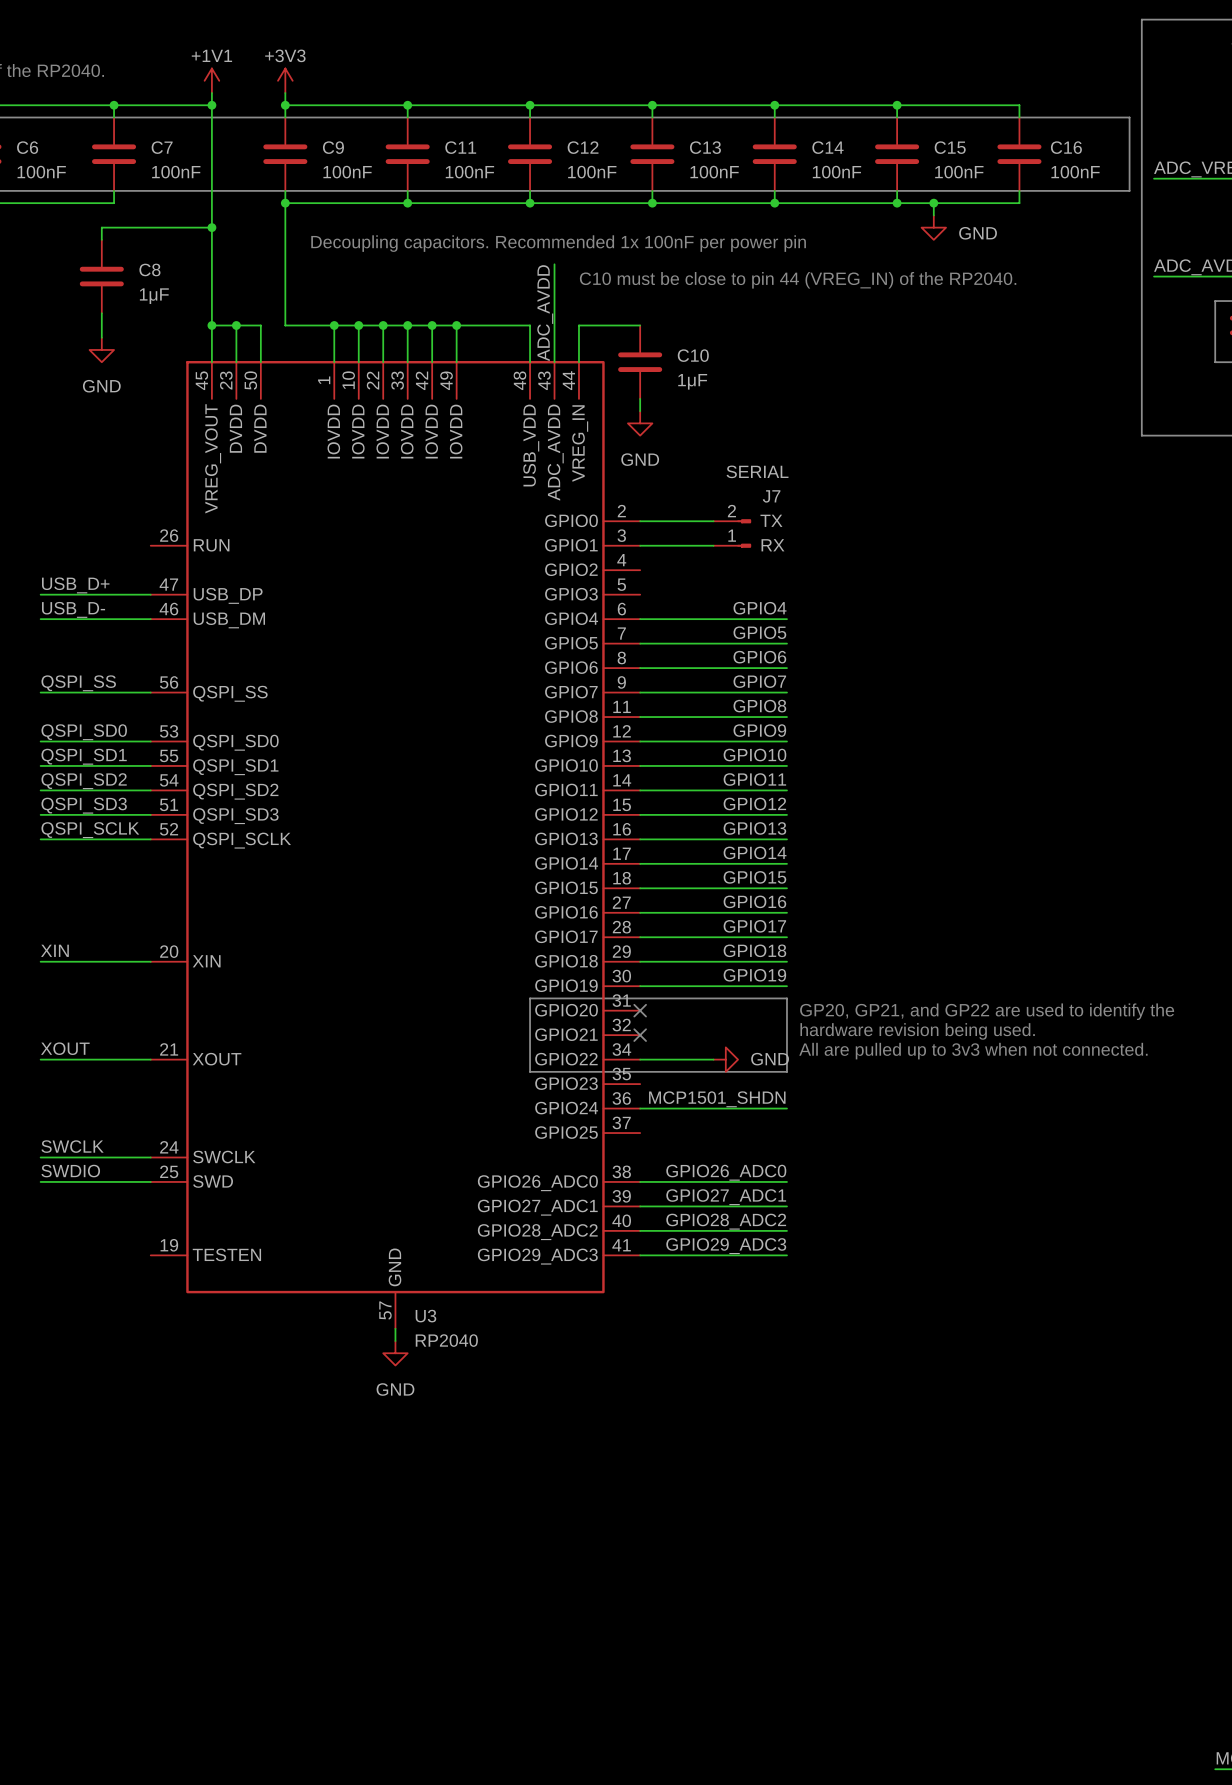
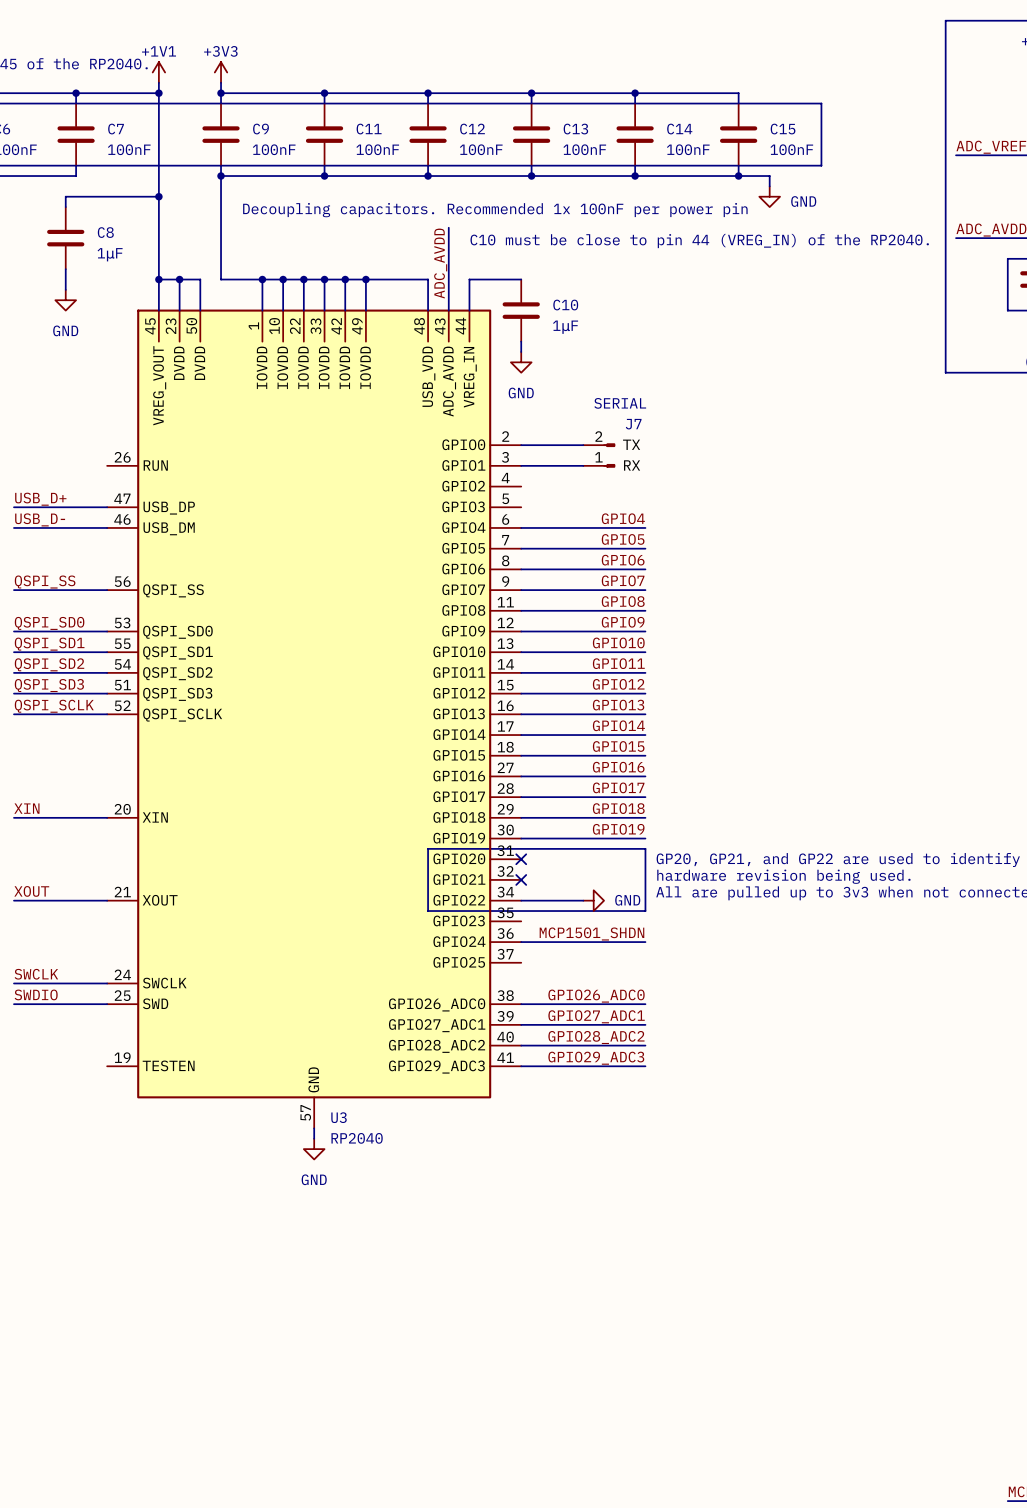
wire: (897, 105) (1019, 105) (1019, 117) -> none
junction: (897, 105) -> none
line: (994, 117) (1129, 117) (1129, 190) (994, 190) -> (821, 103) (821, 165)
C16: 100nF (1019, 154) -> none
wire: (1019, 190) (1019, 203) (933, 203) -> none
junction: (933, 203) -> none

